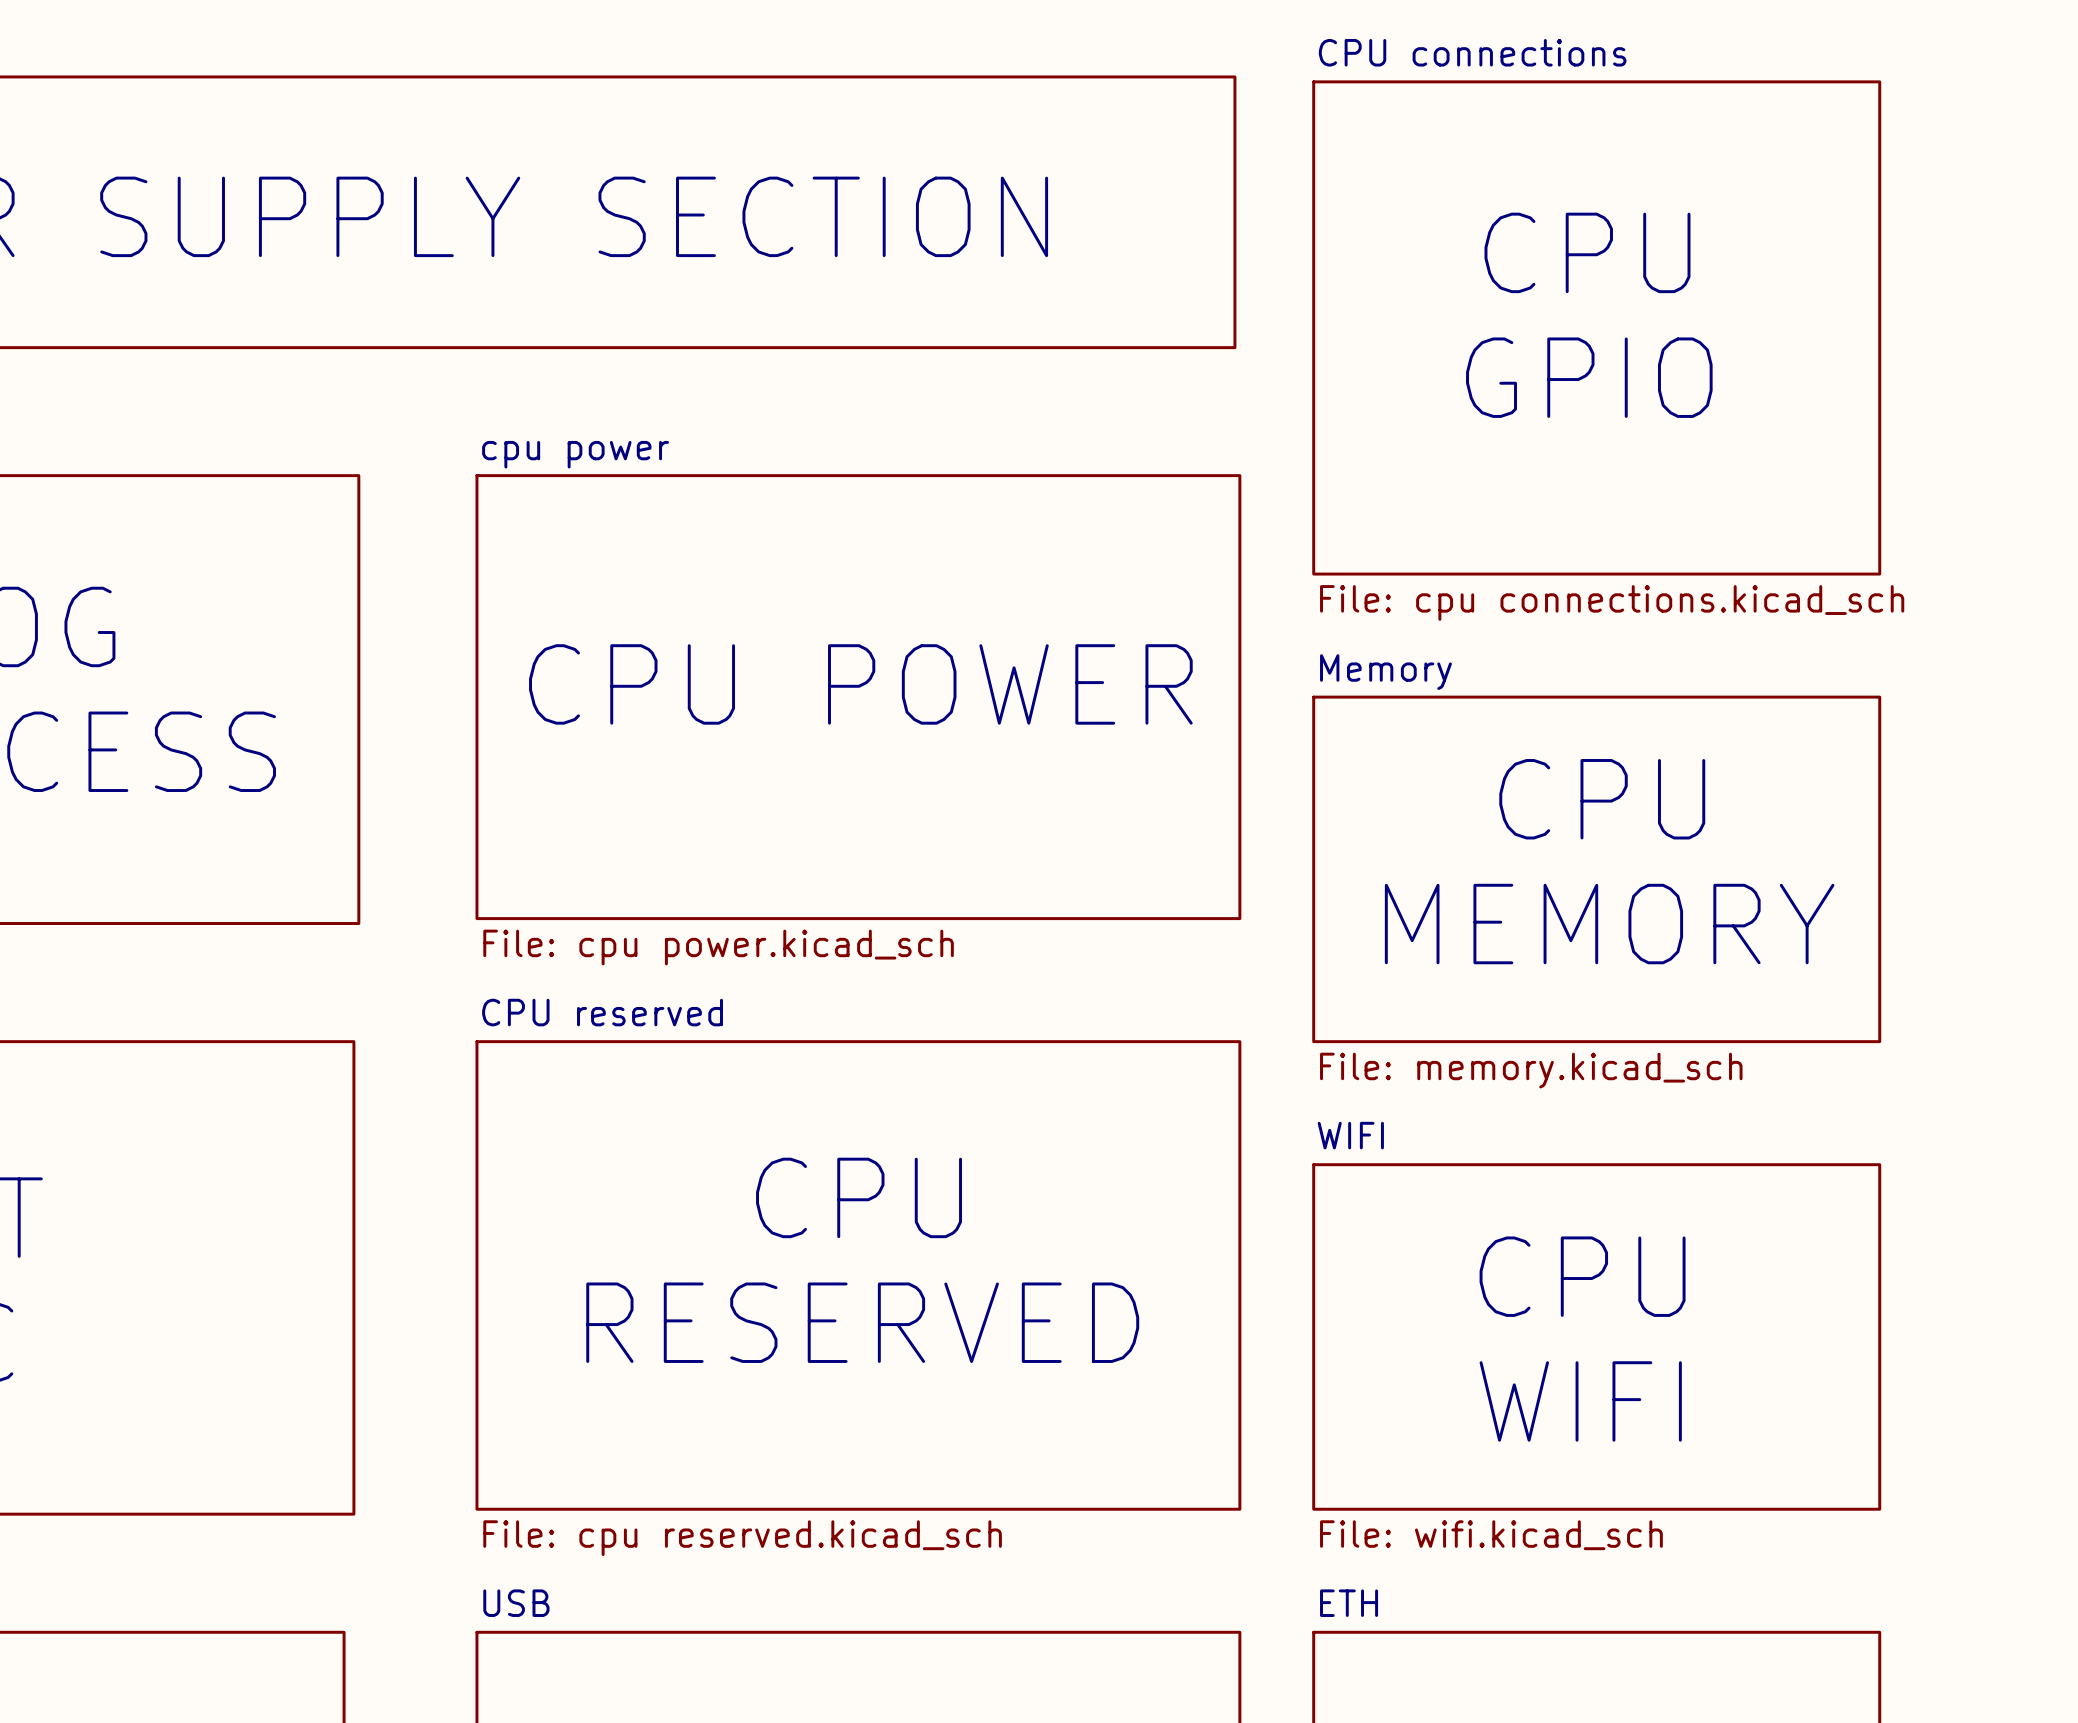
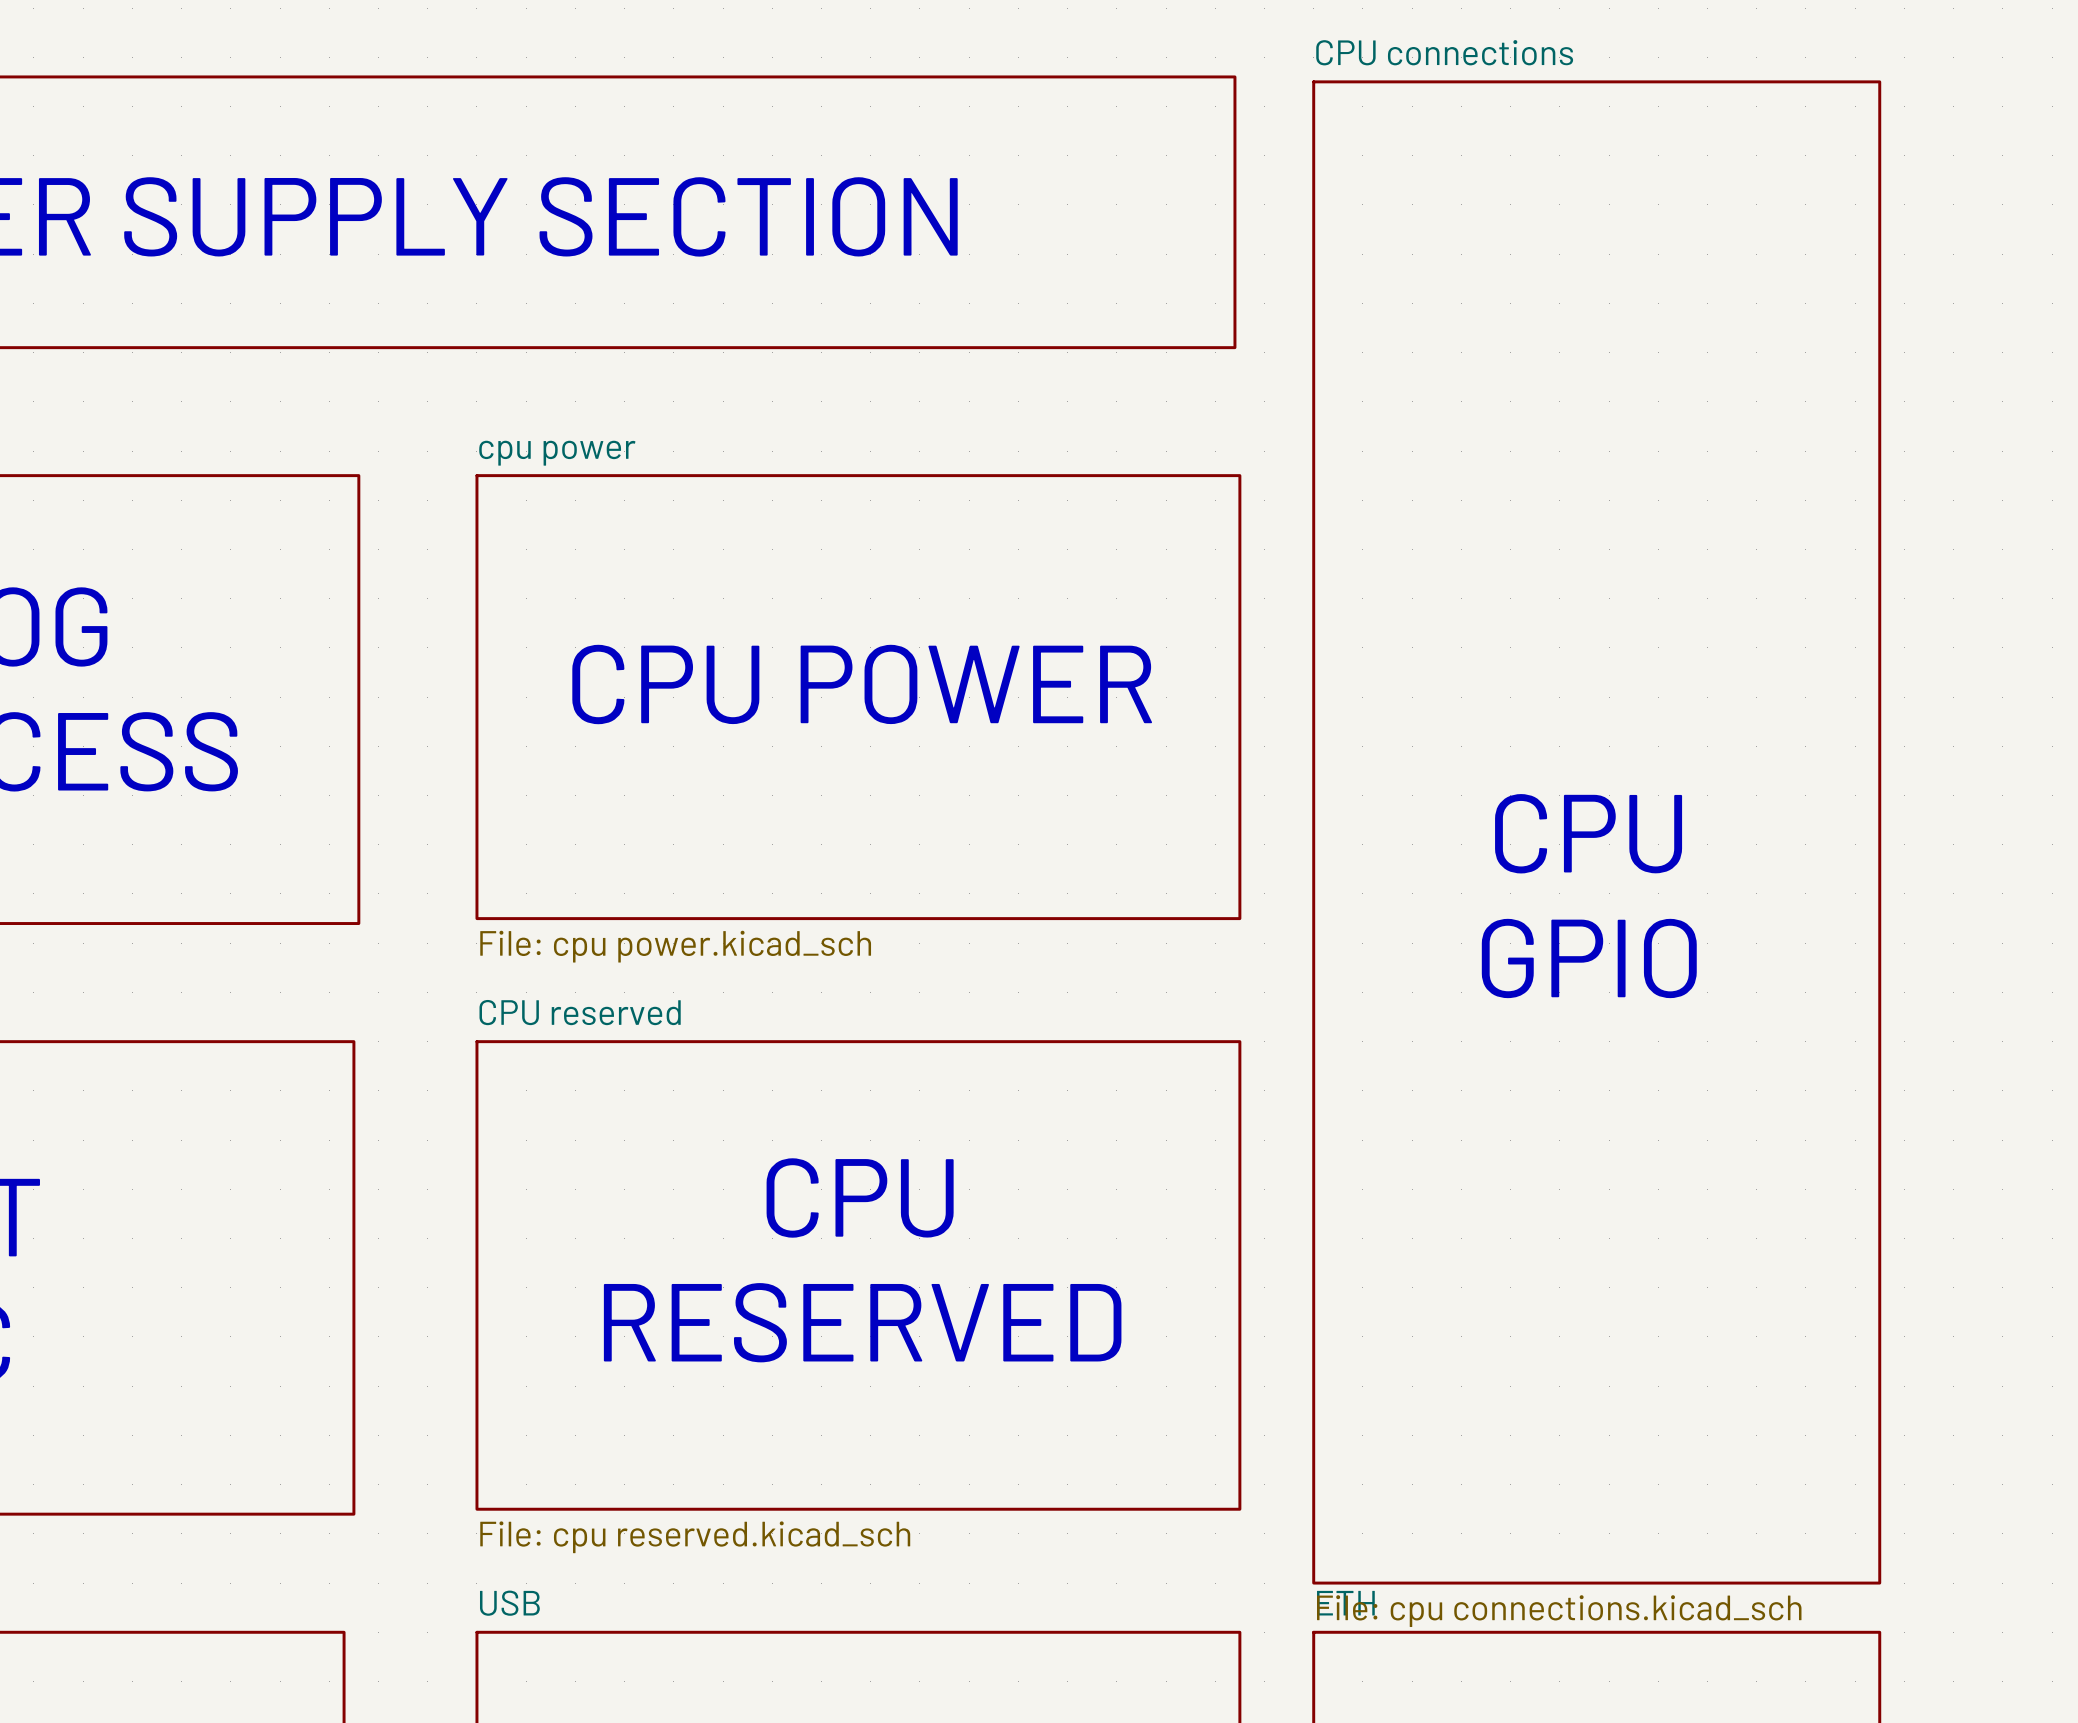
text: CPU (1587, 252) -> none
sheet CPU connections: File: cpu connections.kicad_sch (1596, 327) -> none
text: GPIO (1589, 377) -> none
text position: CPU (1602, 799) -> CPU (1588, 833)
sheet CPU connections: none -> File: cpu connections.kicad_sch (1596, 832)
sheet Memory: File: memory.kicad_sch (1596, 869) -> none
text: MEMORY (1609, 924) -> none
text: none -> GPIO (1589, 958)
text: CPU (1582, 1276) -> none
sheet WIFI: File: wifi.kicad_sch (1596, 1336) -> none
text: WIFI (1580, 1401) -> none

